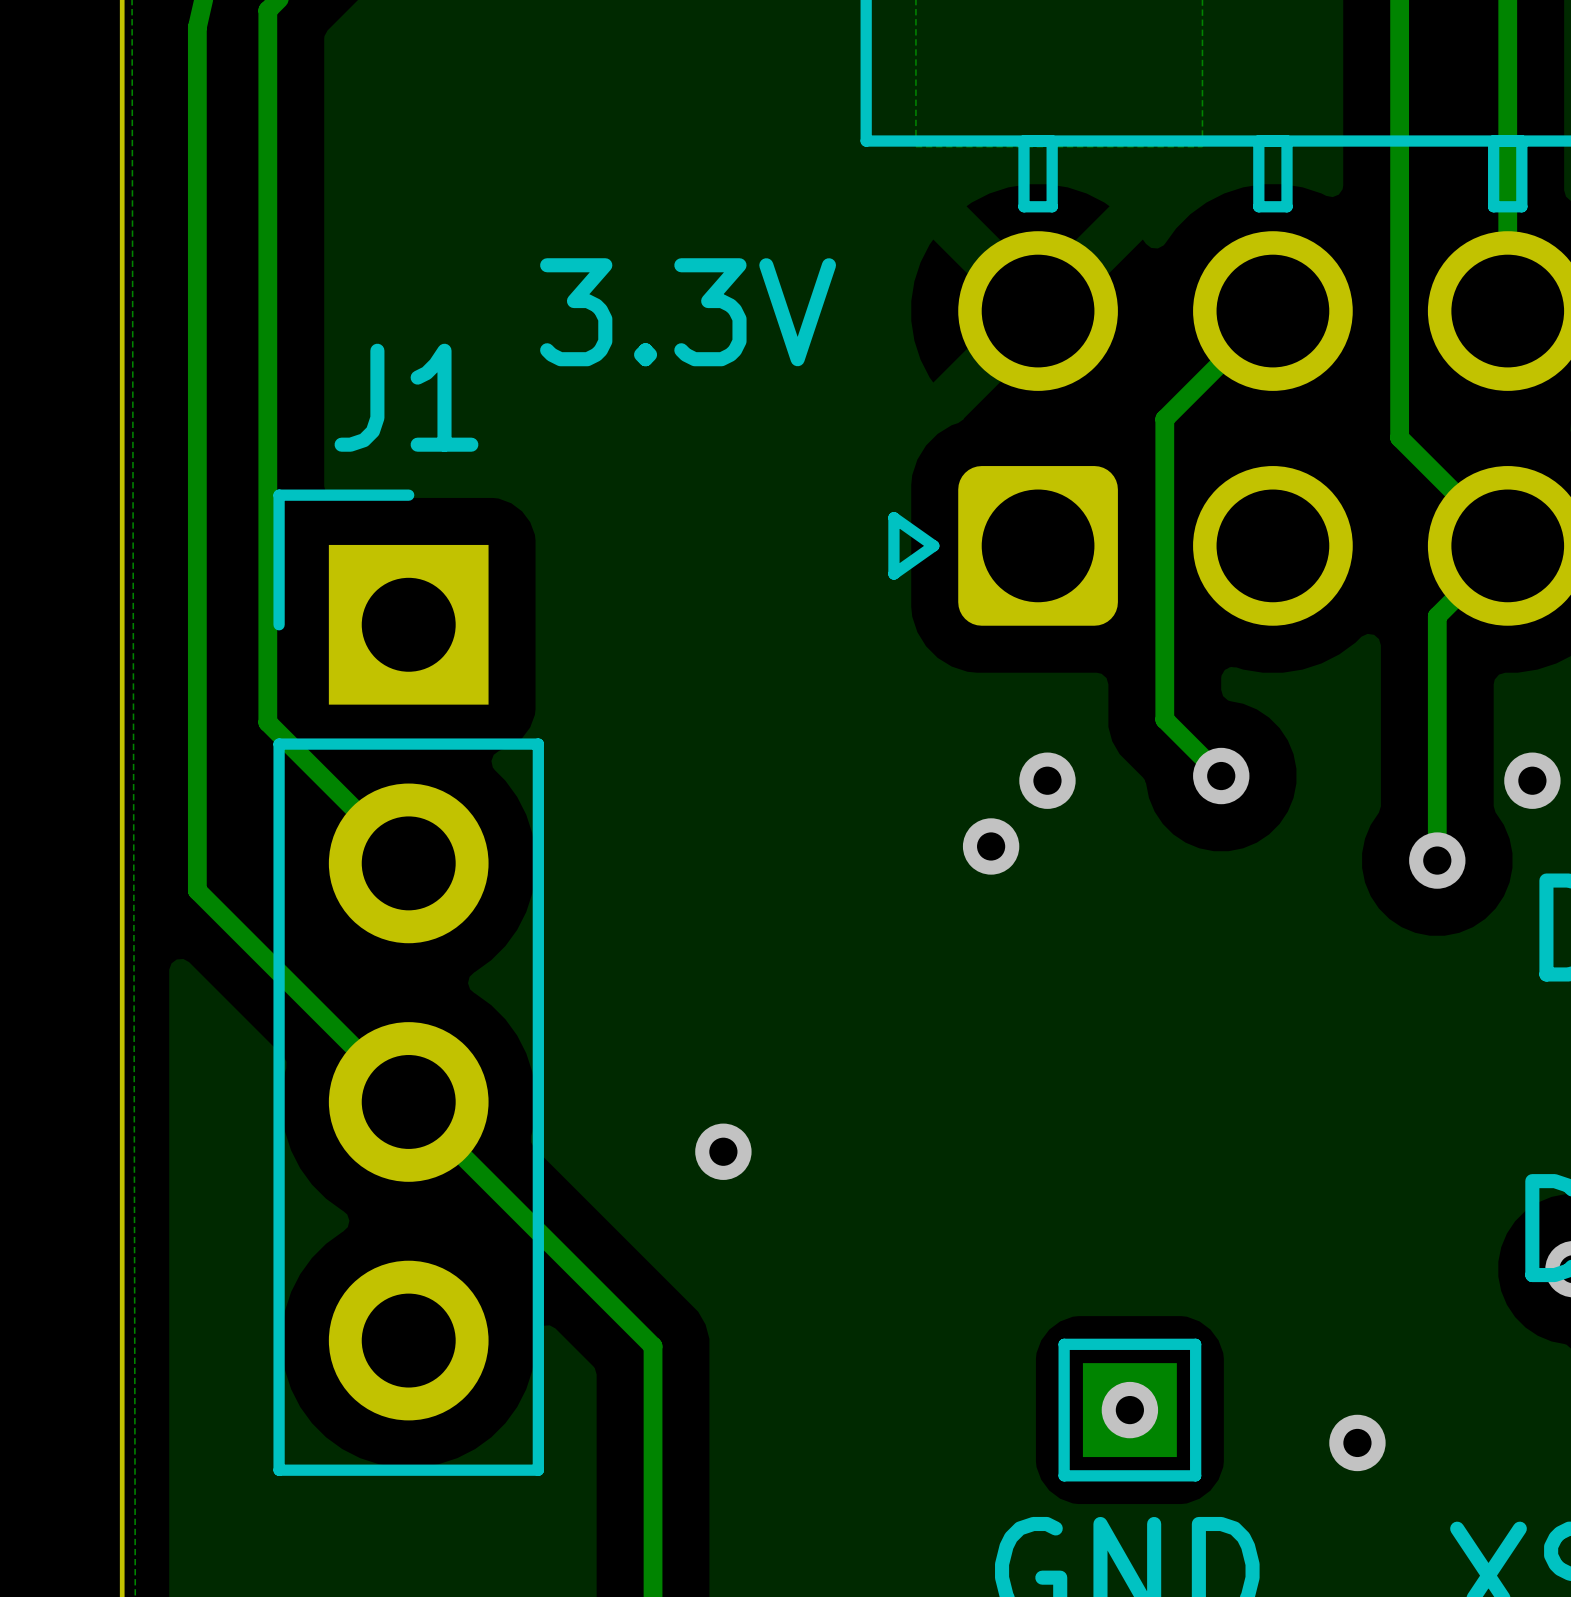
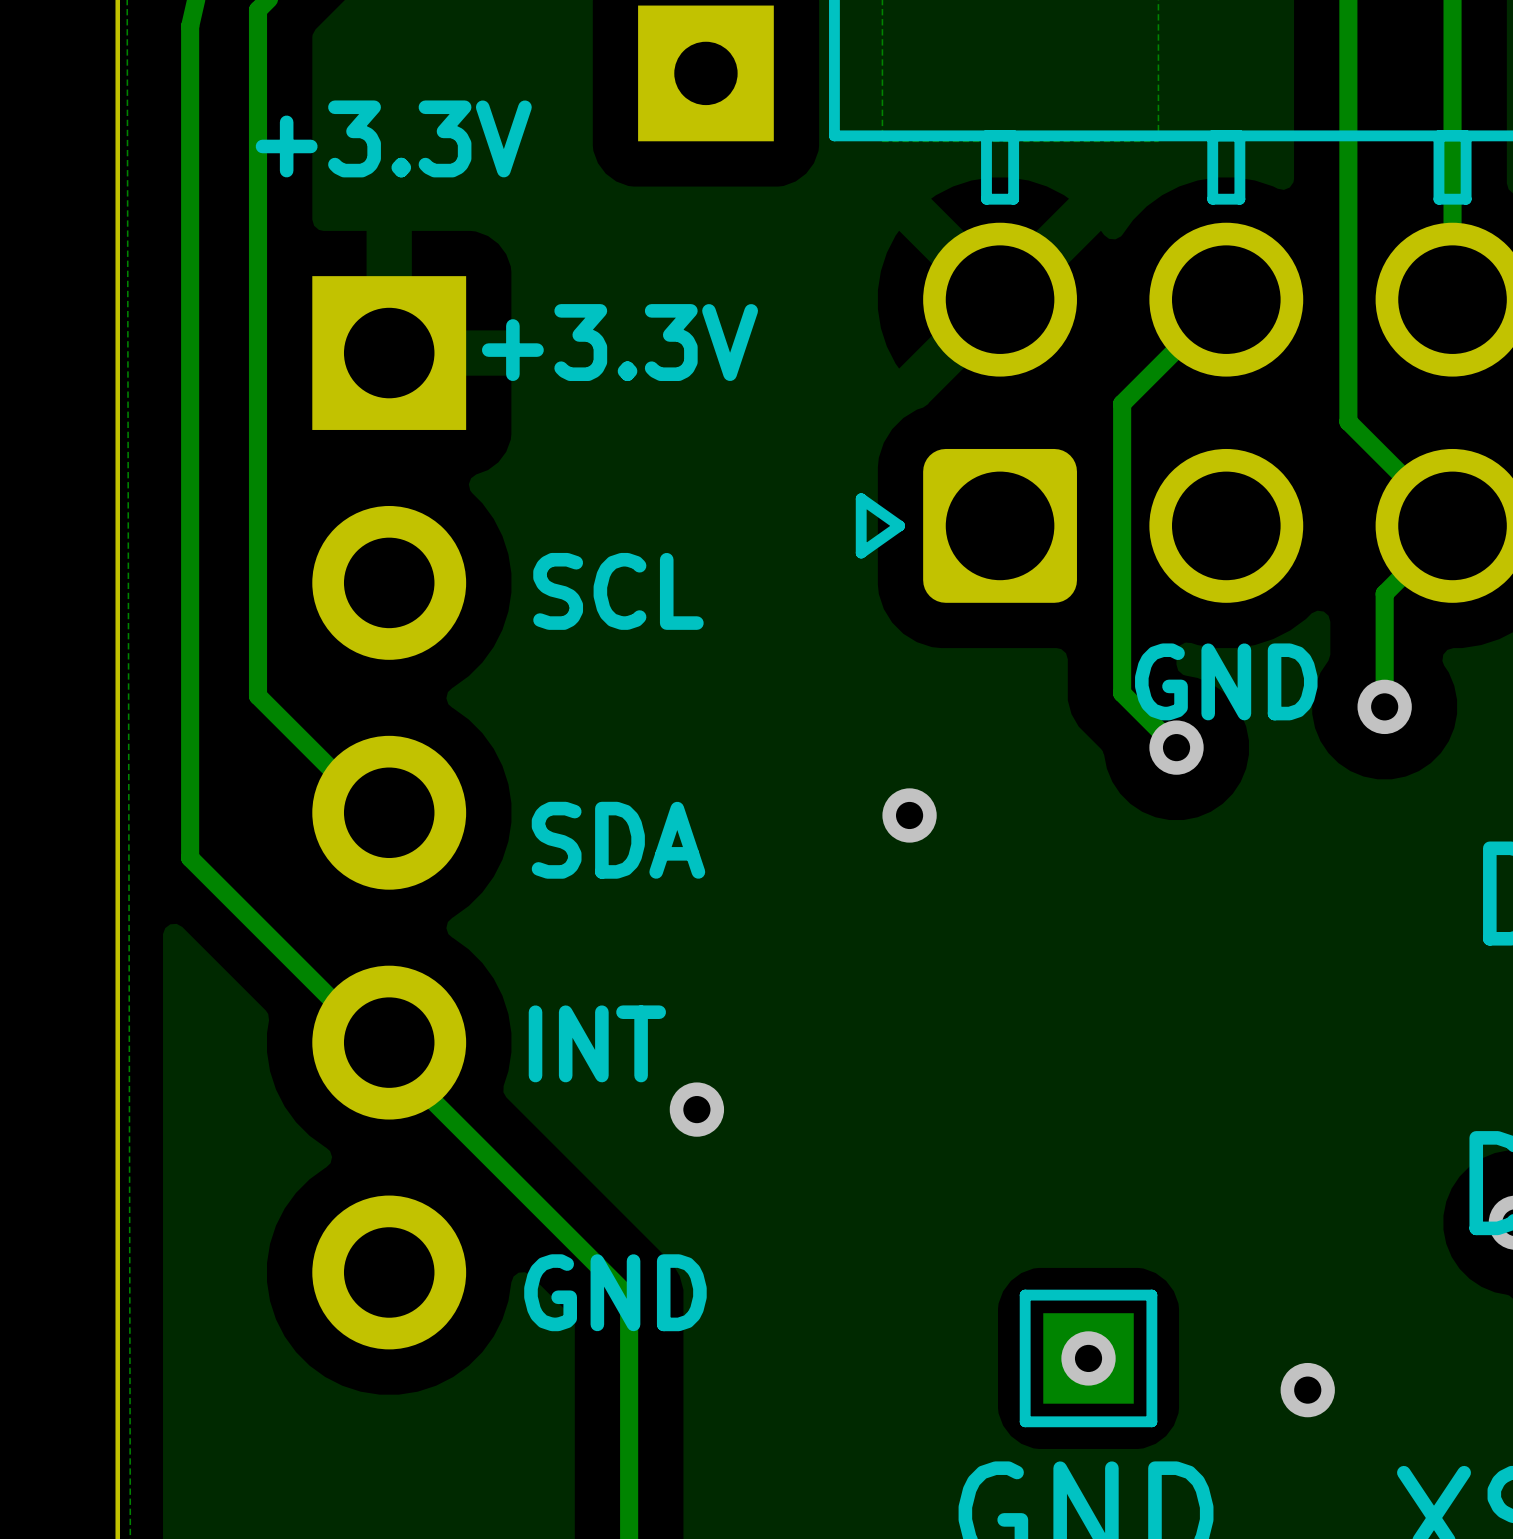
part: none -> (705, 73)
text: none -> +3.3V (393, 138)
text: 3.3V (688, 312) -> +3.3V (619, 342)
text: none -> SCL (618, 591)
text: none -> GND (1226, 681)
track: (1437, 733) (1437, 860) -> none
via: none -> (1384, 706)
via: (1047, 780) -> none
via: (1532, 780) -> none
part: none -> (389, 812)
via position: (991, 846) -> (909, 815)
via: (1437, 860) -> none
text: none -> SDA (618, 840)
J1: (408, 982) -> none
text: none -> INT (597, 1043)
text: none -> GND (615, 1292)

